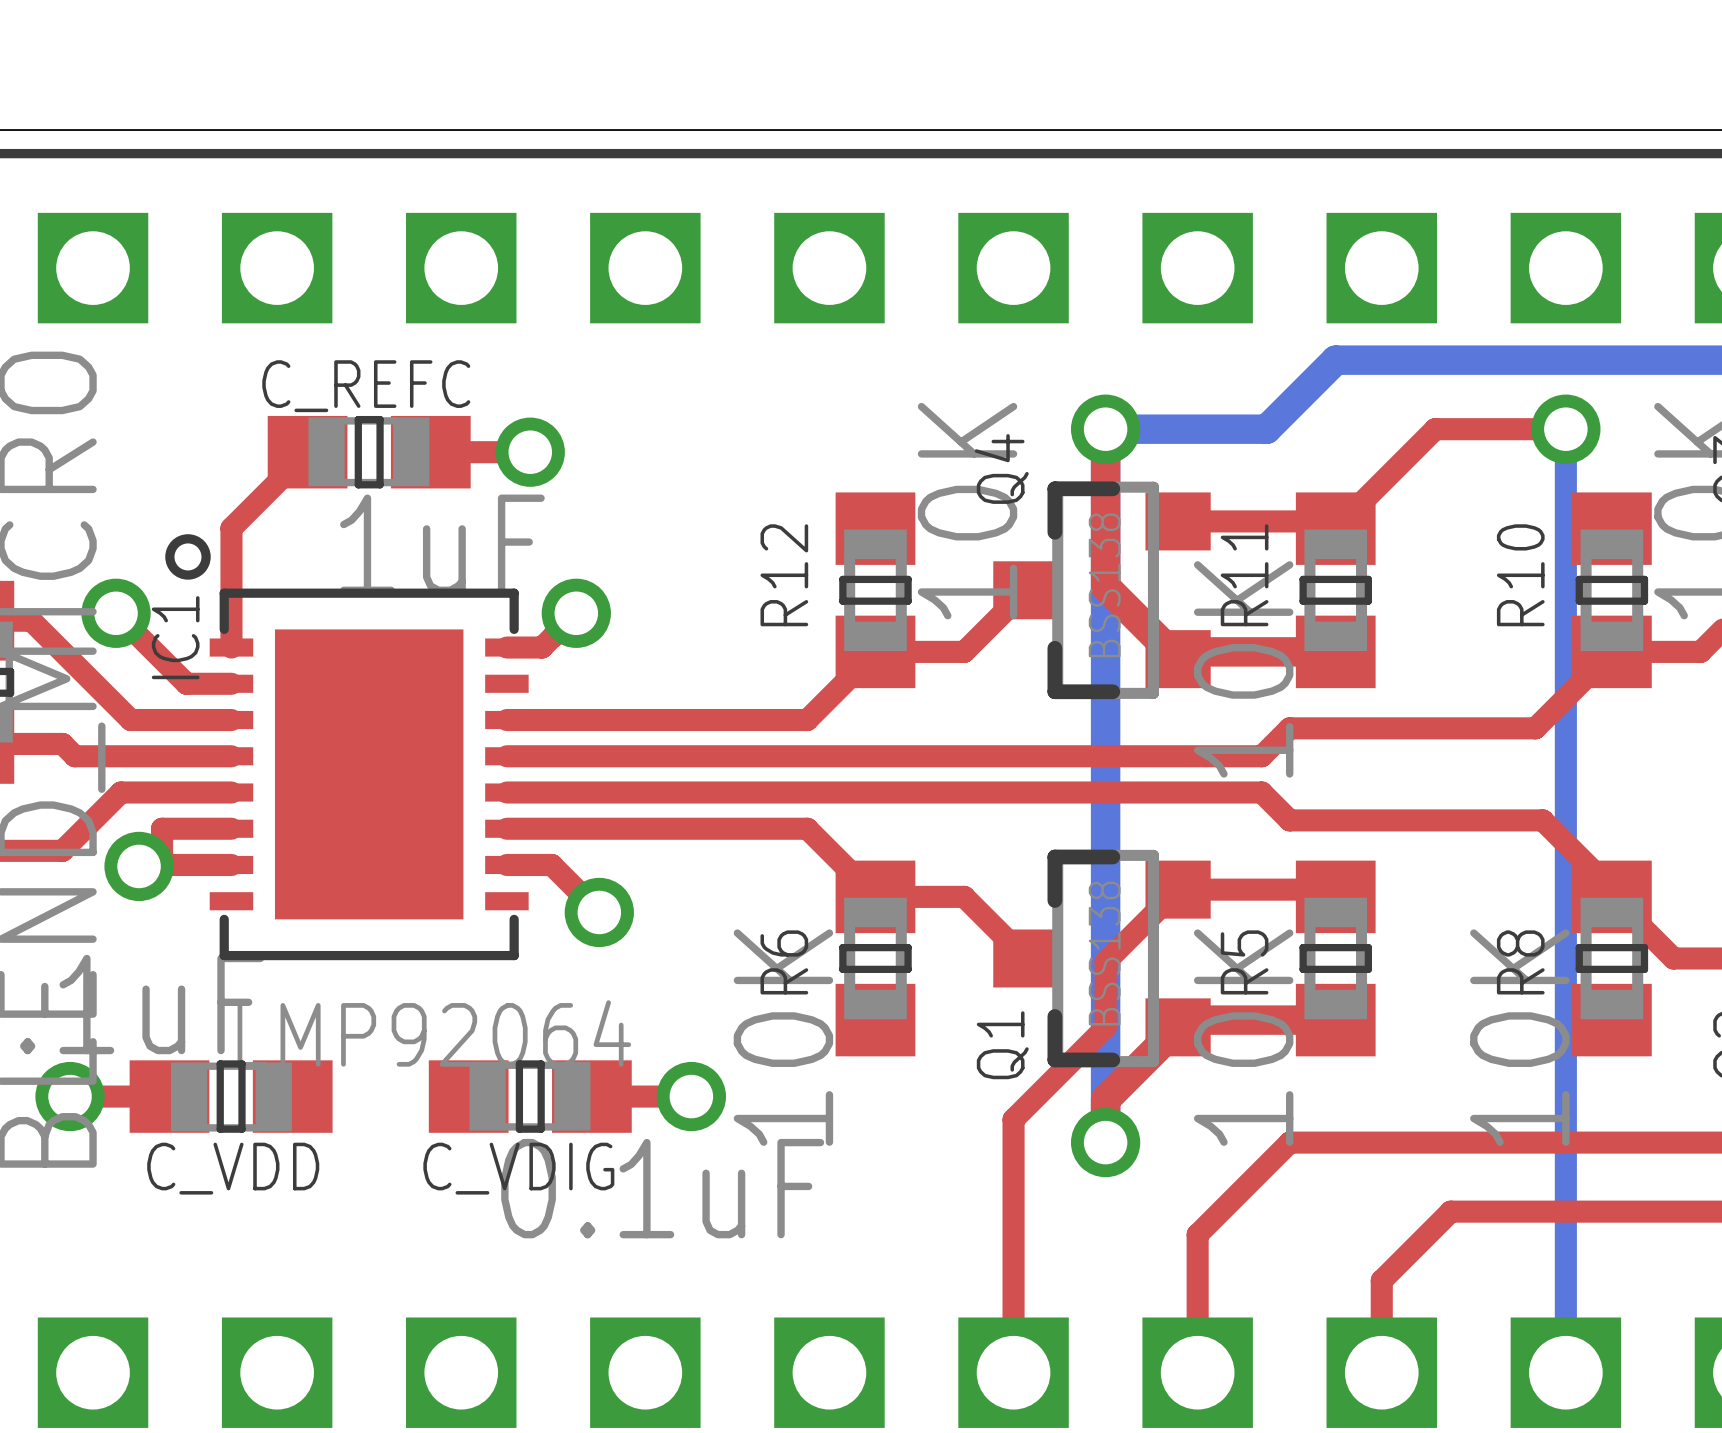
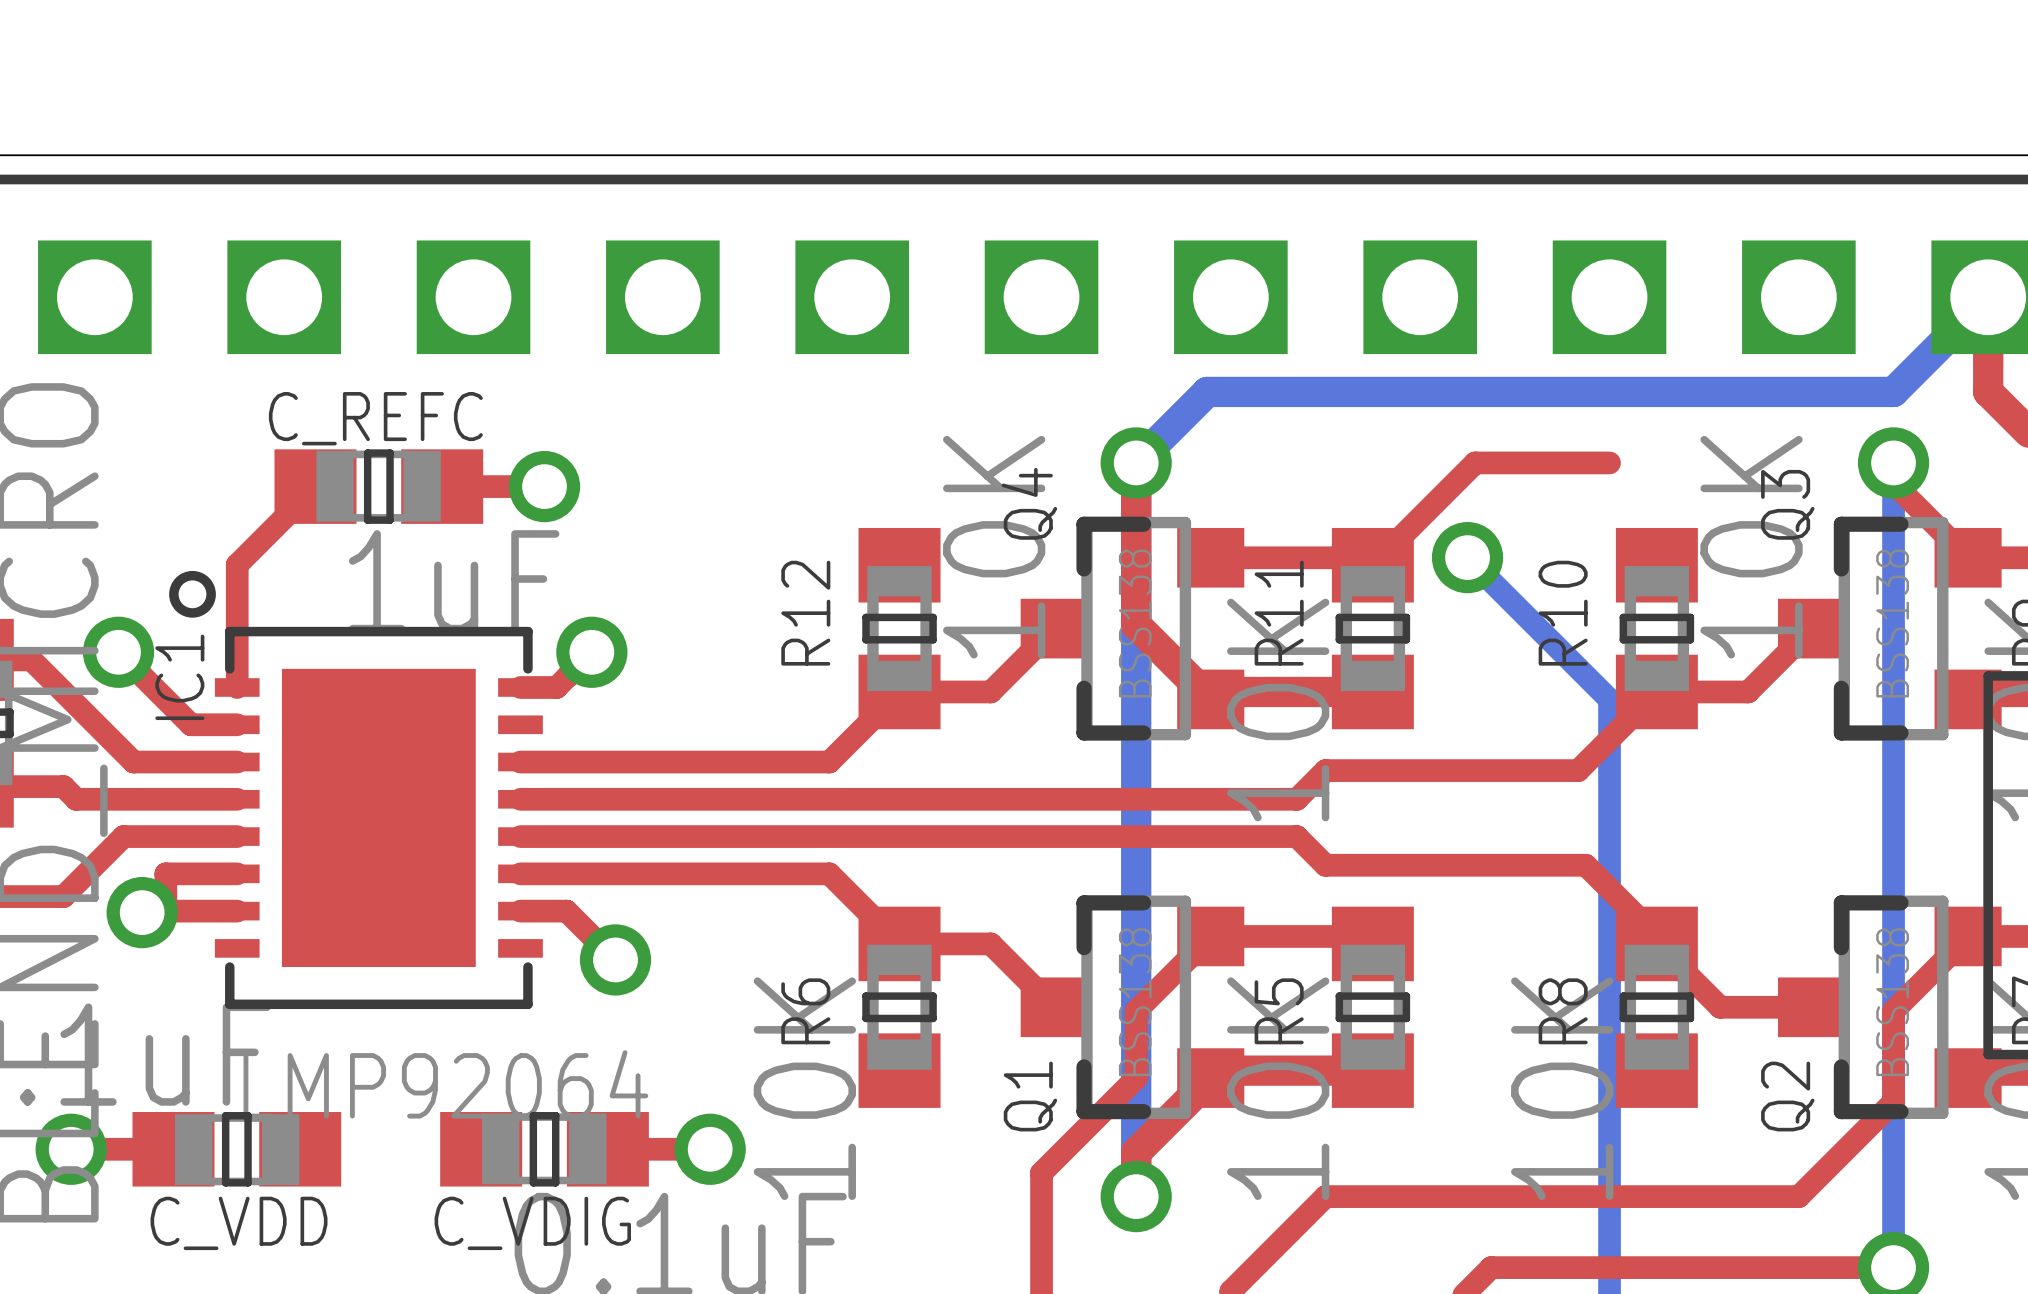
bottom track: (1335, 360) (1266, 429) (1105, 429) -> (1372, 391) (1207, 391) (1136, 462)
bottom track: (1565, 429) (1565, 659) -> (1467, 557) (1609, 699)
via position: (1565, 429) -> (1467, 557)

